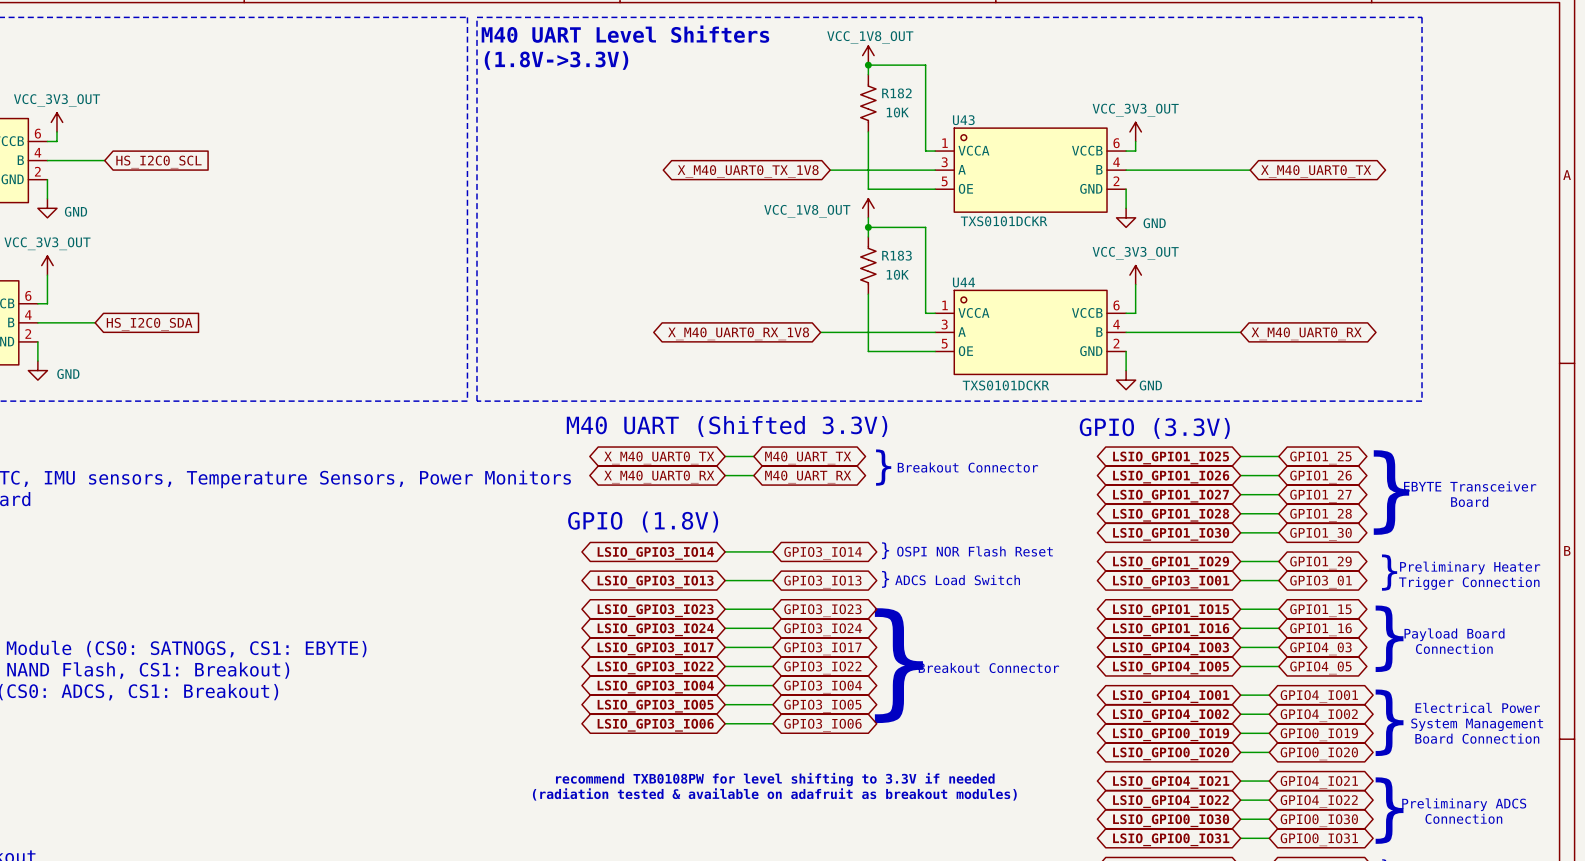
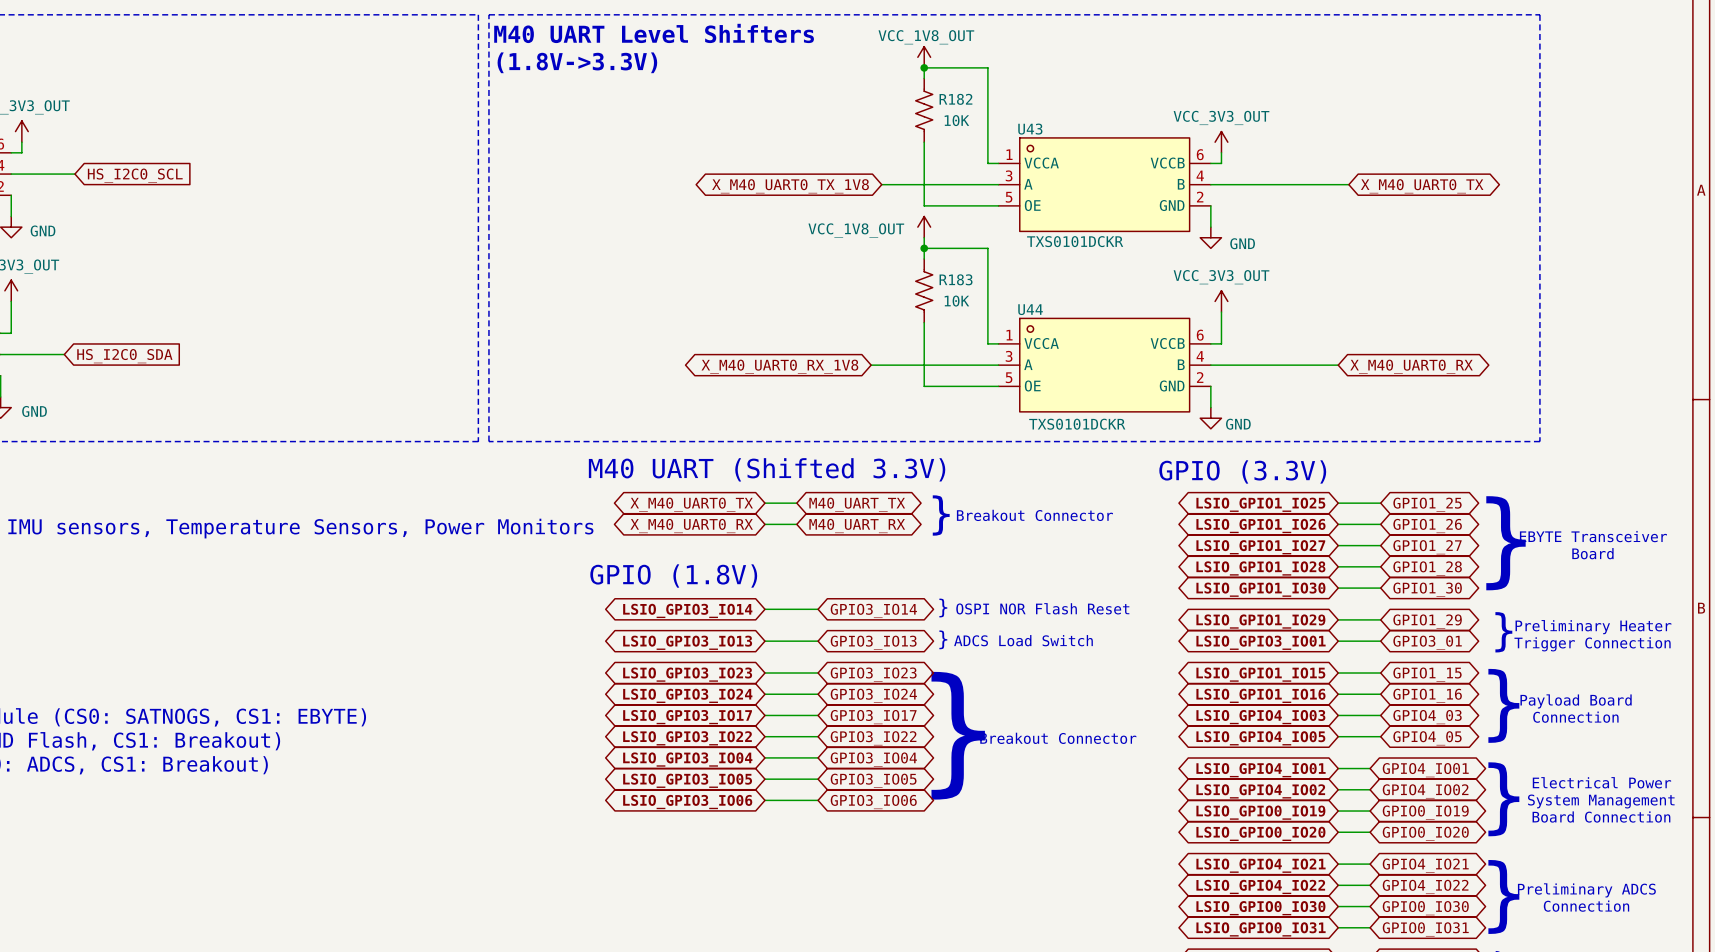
text: recommend TXB0108PW for level shifting to 3.3V if needed (775, 779) -> none
text: (radiation tested & available on adafruit as breakout modules) (774, 794) -> none

